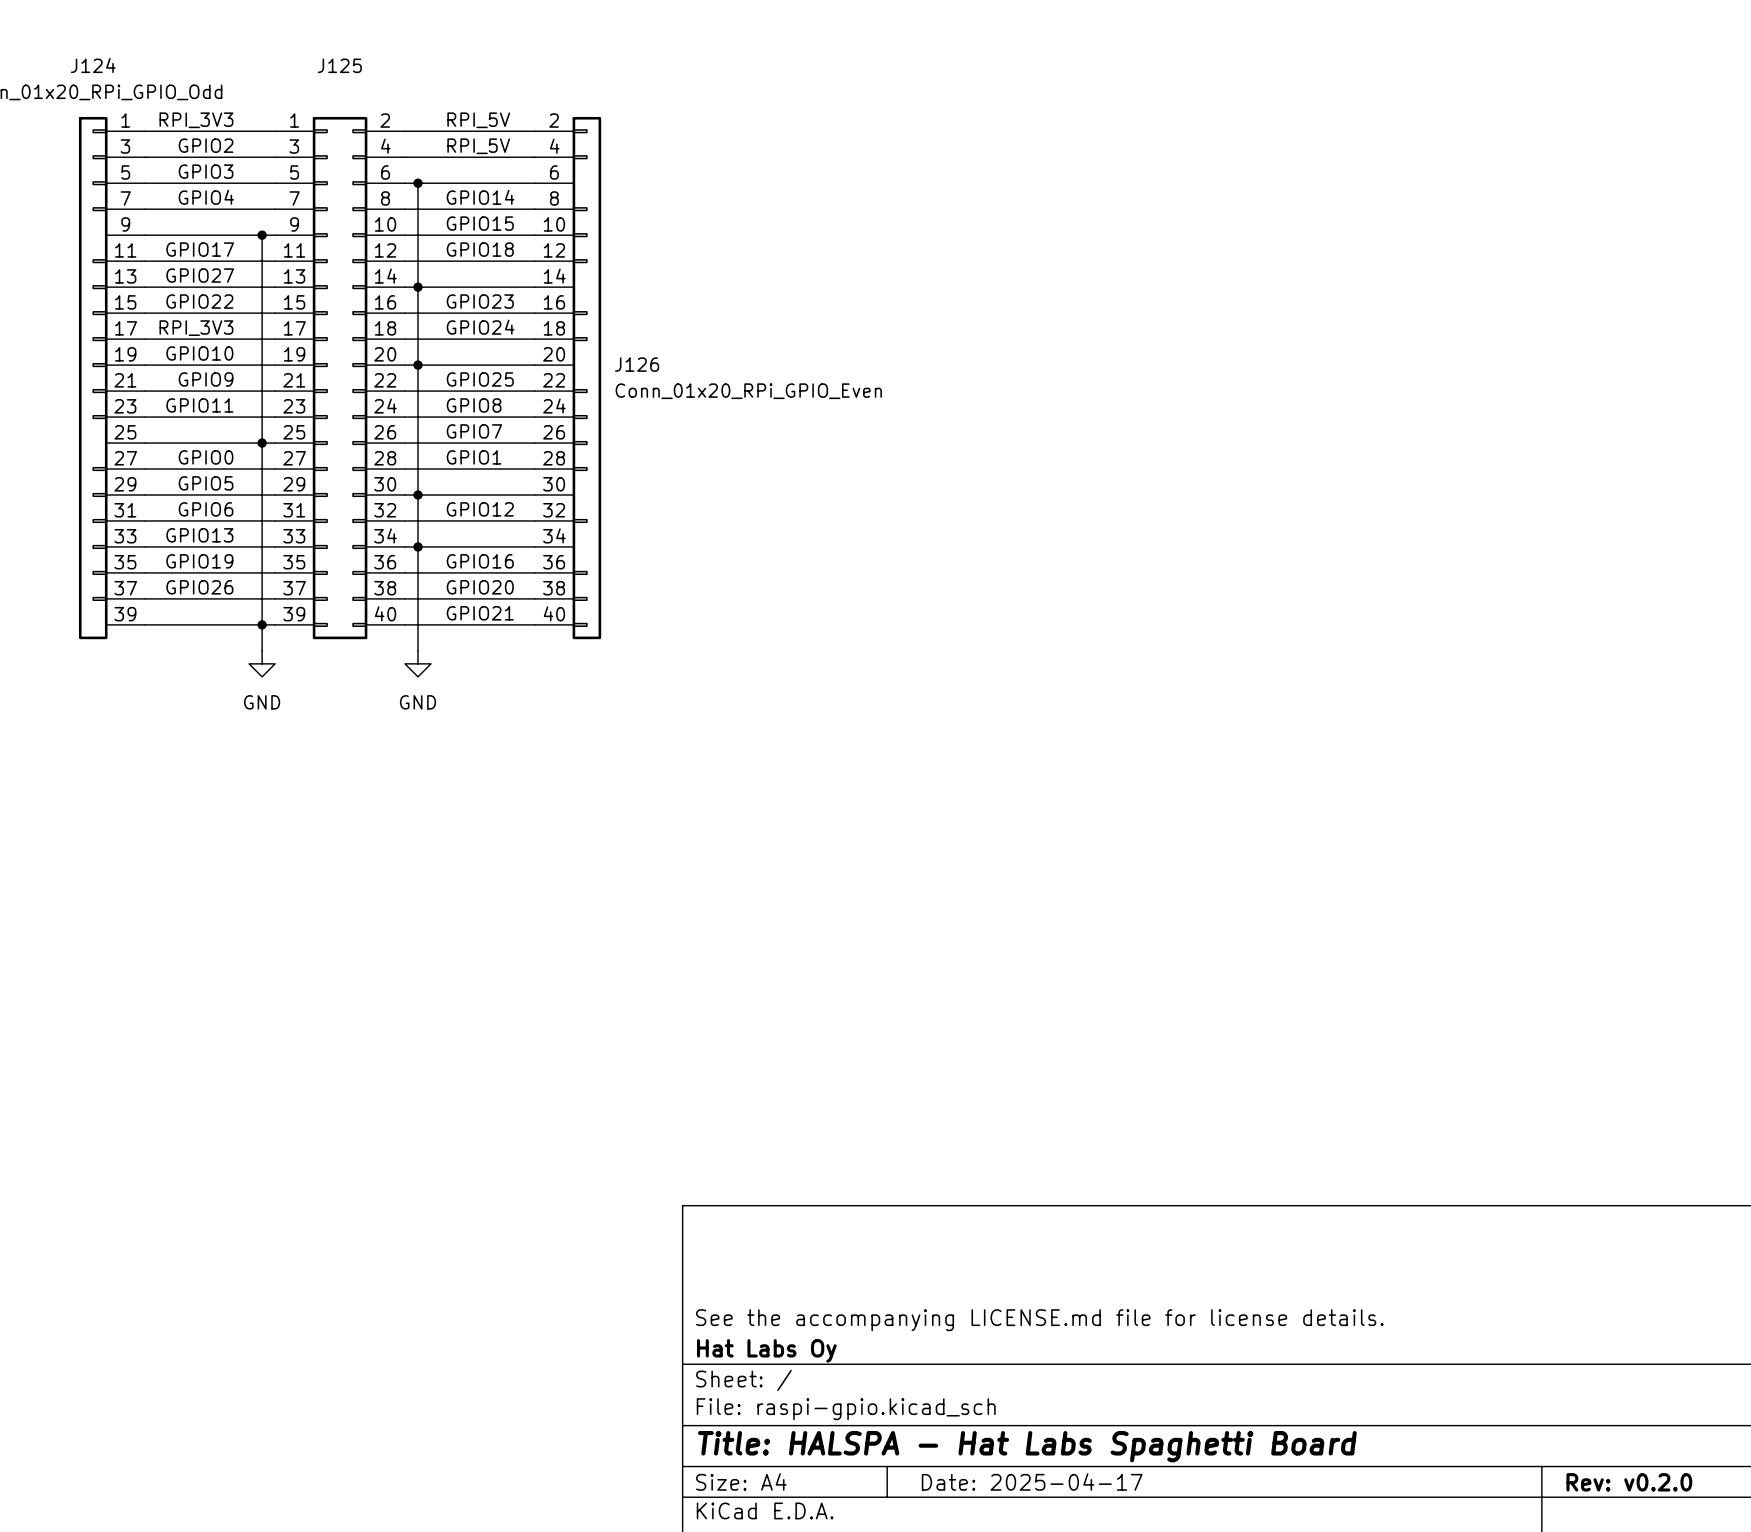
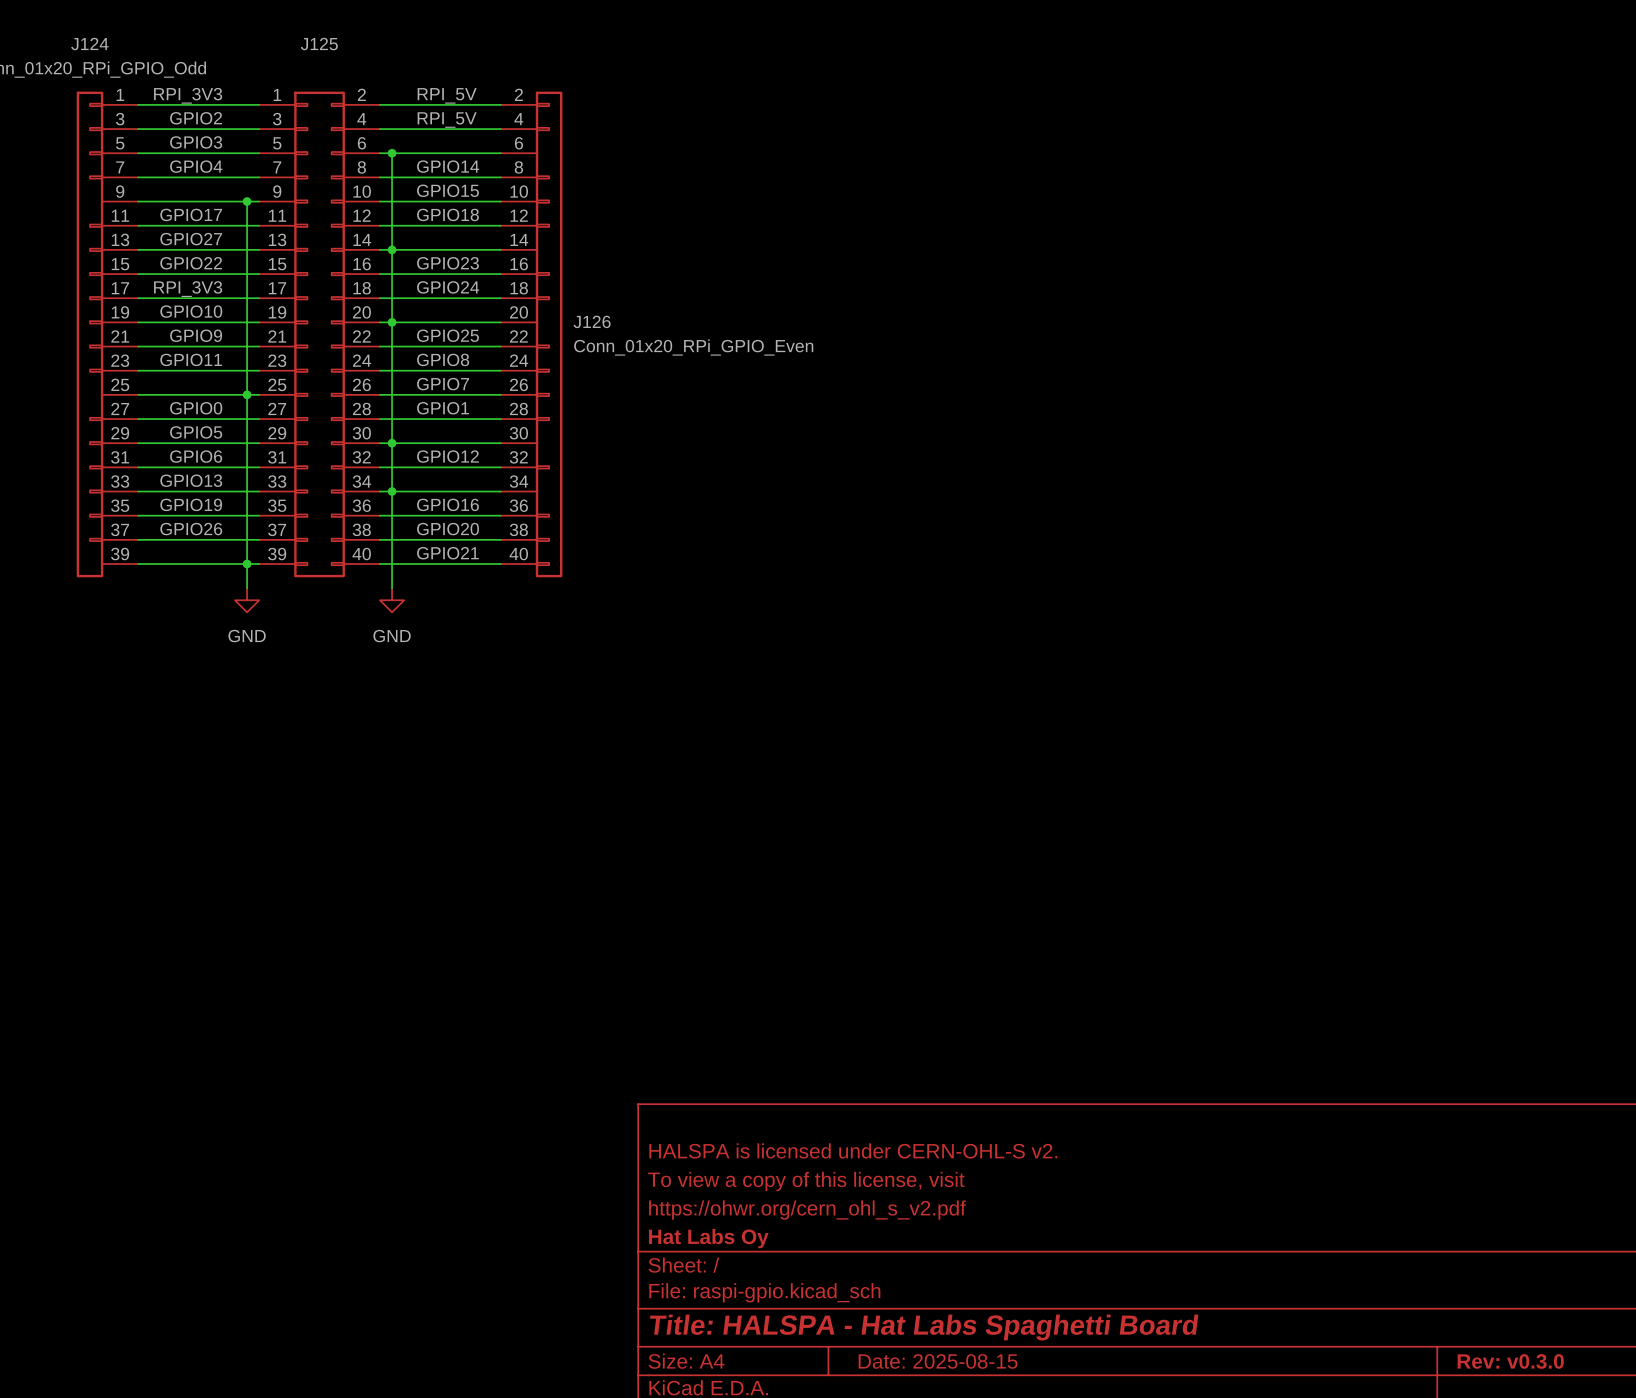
title block: none -> HALSPA is licensed under CERN-OHL-S v2. (853, 1150)
title block: none -> To view a copy of this license, visit (806, 1181)
title block: See the accompanying LICENSE.md file for license details. (1039, 1320) -> https://ohwr.org/cern_ohl_s_v2.pdf (807, 1210)
title block: Date: 2025-04-17 (1032, 1481) -> Date: 2025-08-15 (938, 1361)
title block: Rev: v0.2.0 (1629, 1482) -> Rev: v0.3.0 (1510, 1361)

